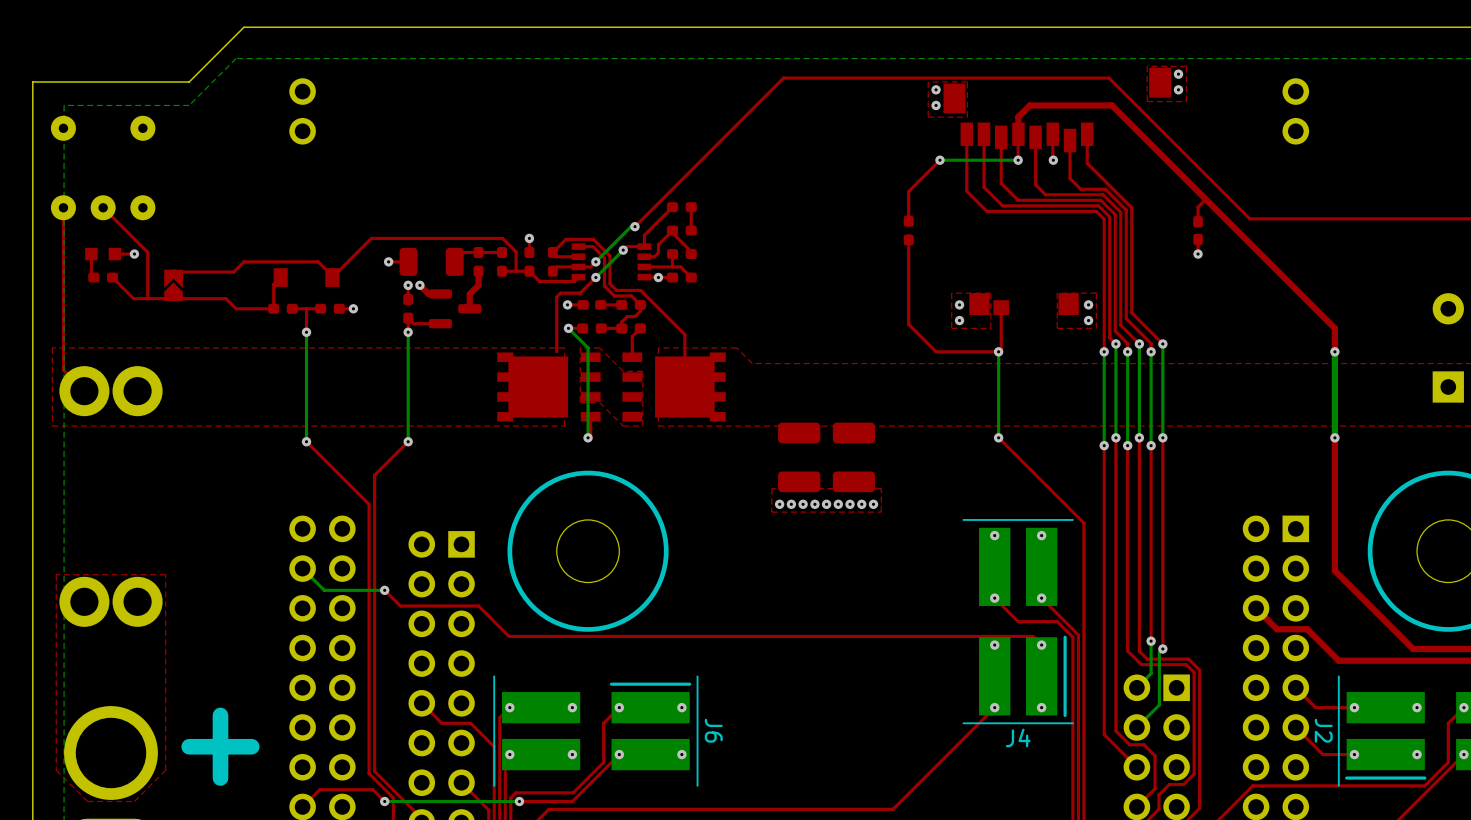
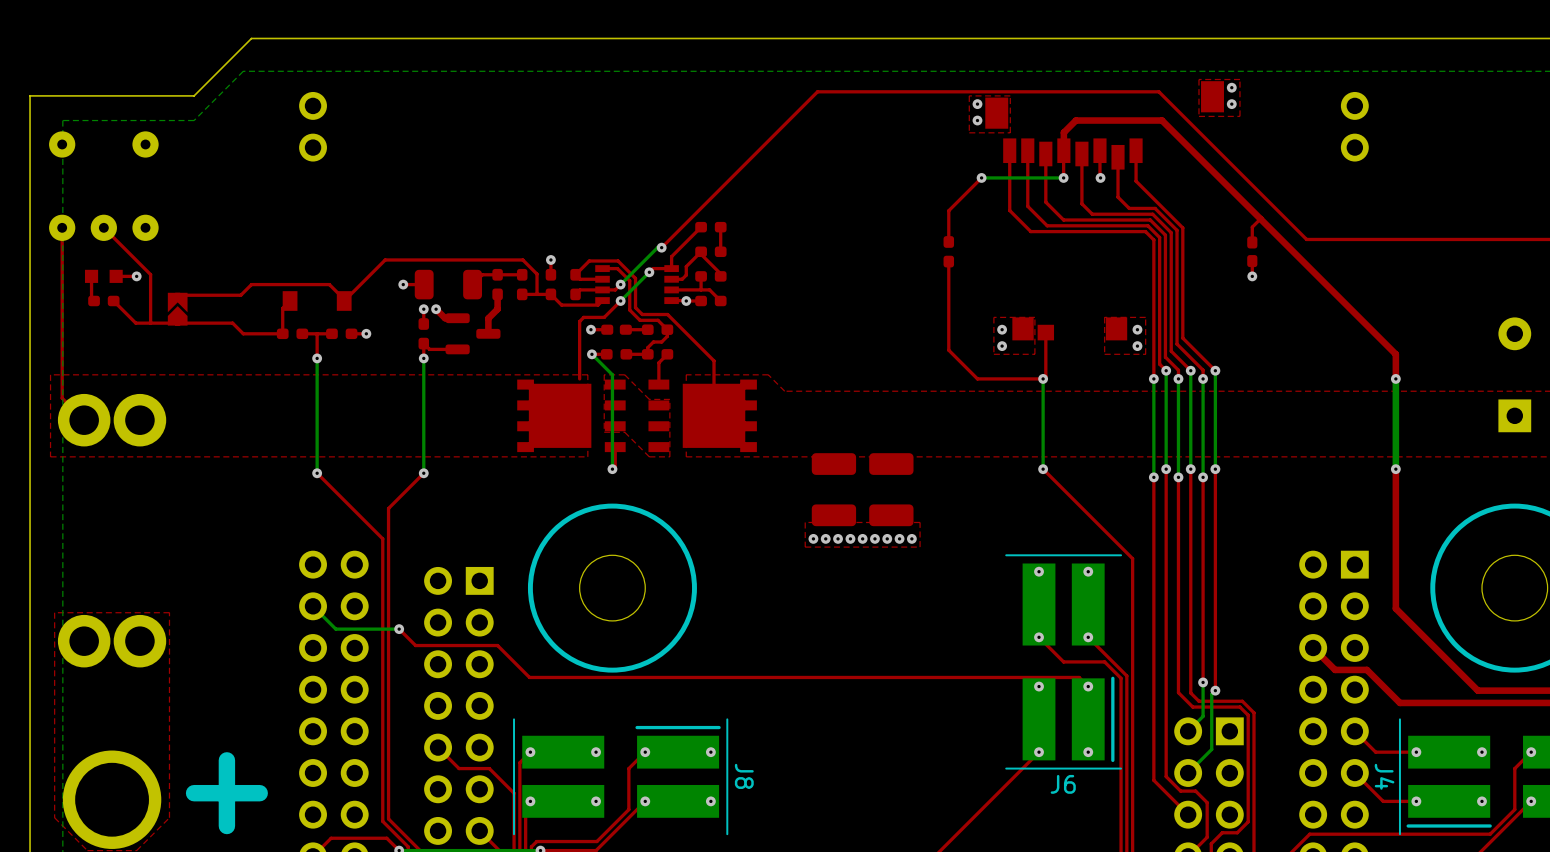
J6 name: J6 (713, 730) -> J8 (744, 776)
J2 name: J2 (1323, 730) -> J4 (1384, 776)
J4 name: J4 (1018, 737) -> J6 (1063, 784)

